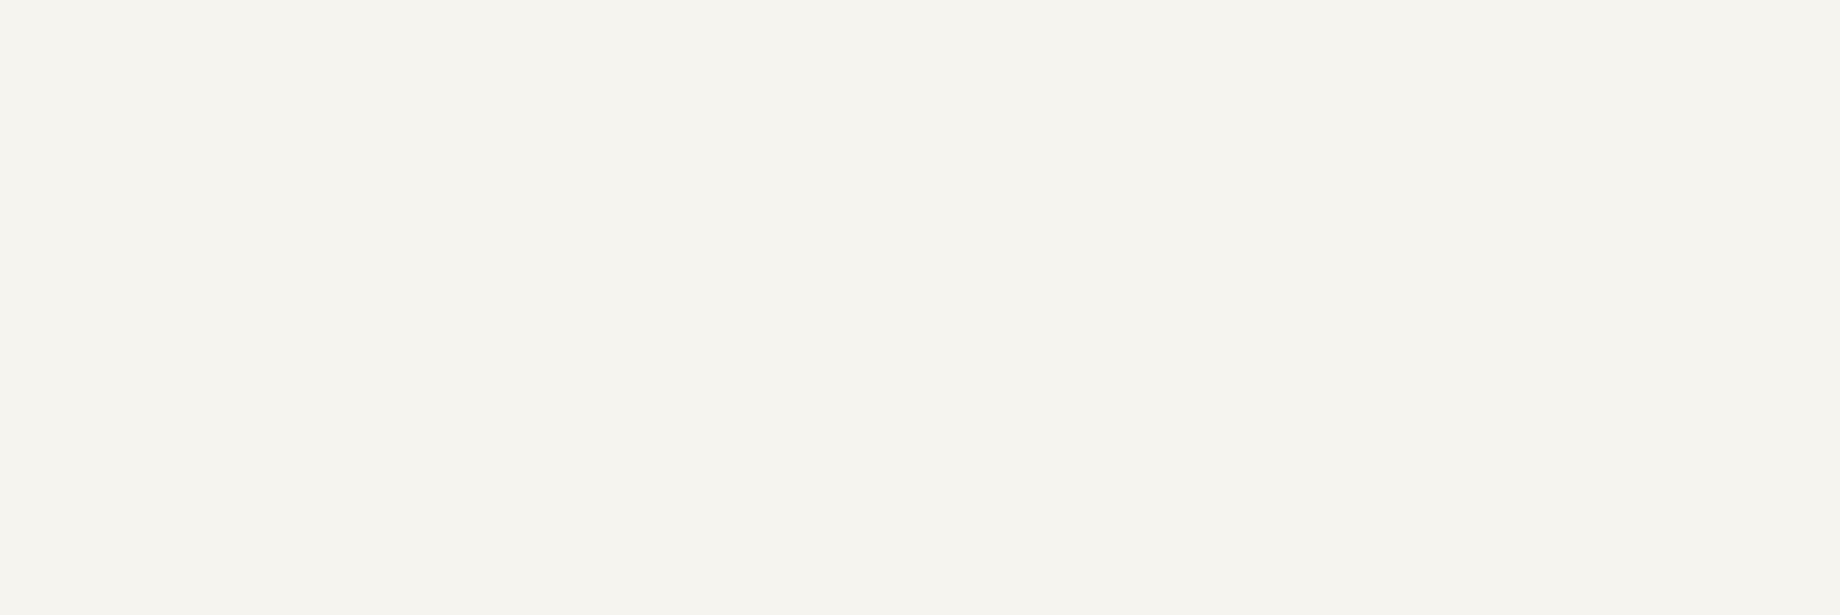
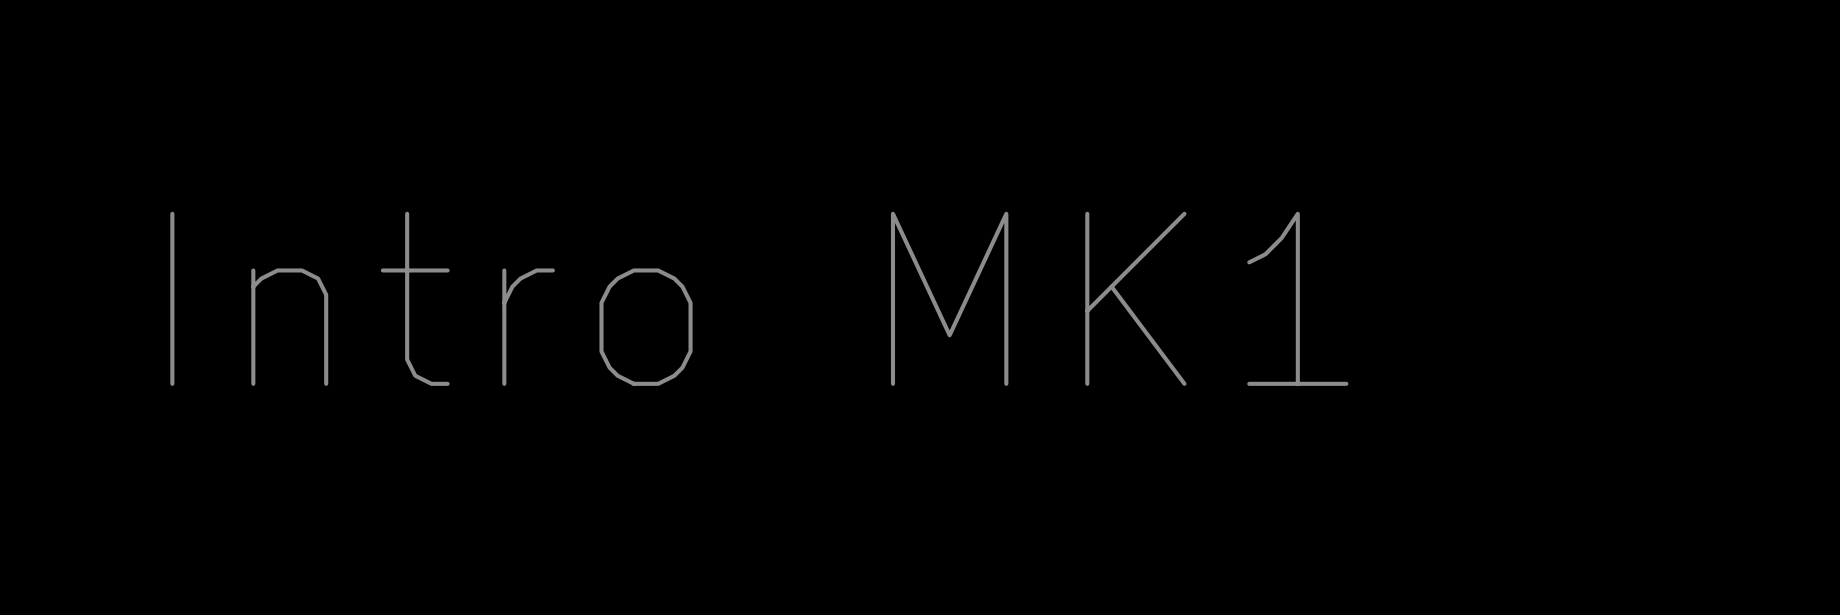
text: none -> Intro MK1 (759, 298)

